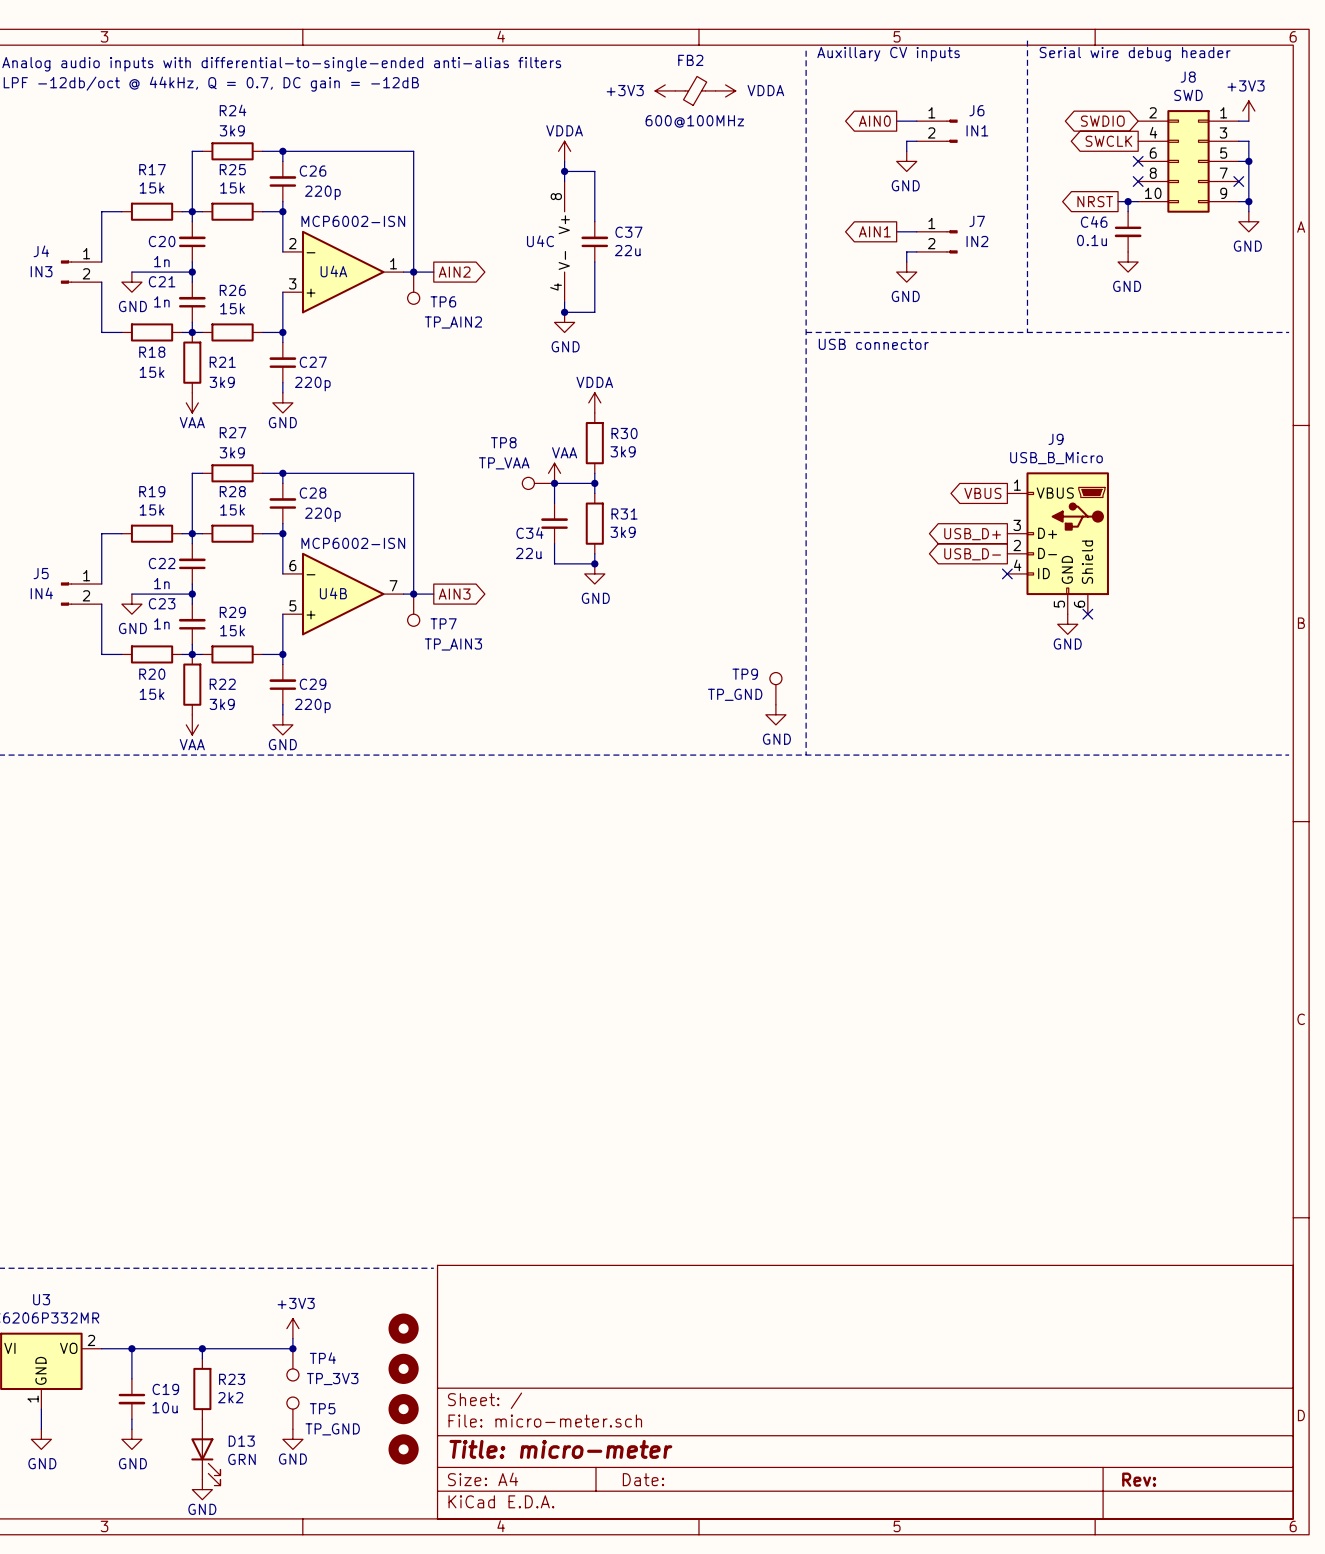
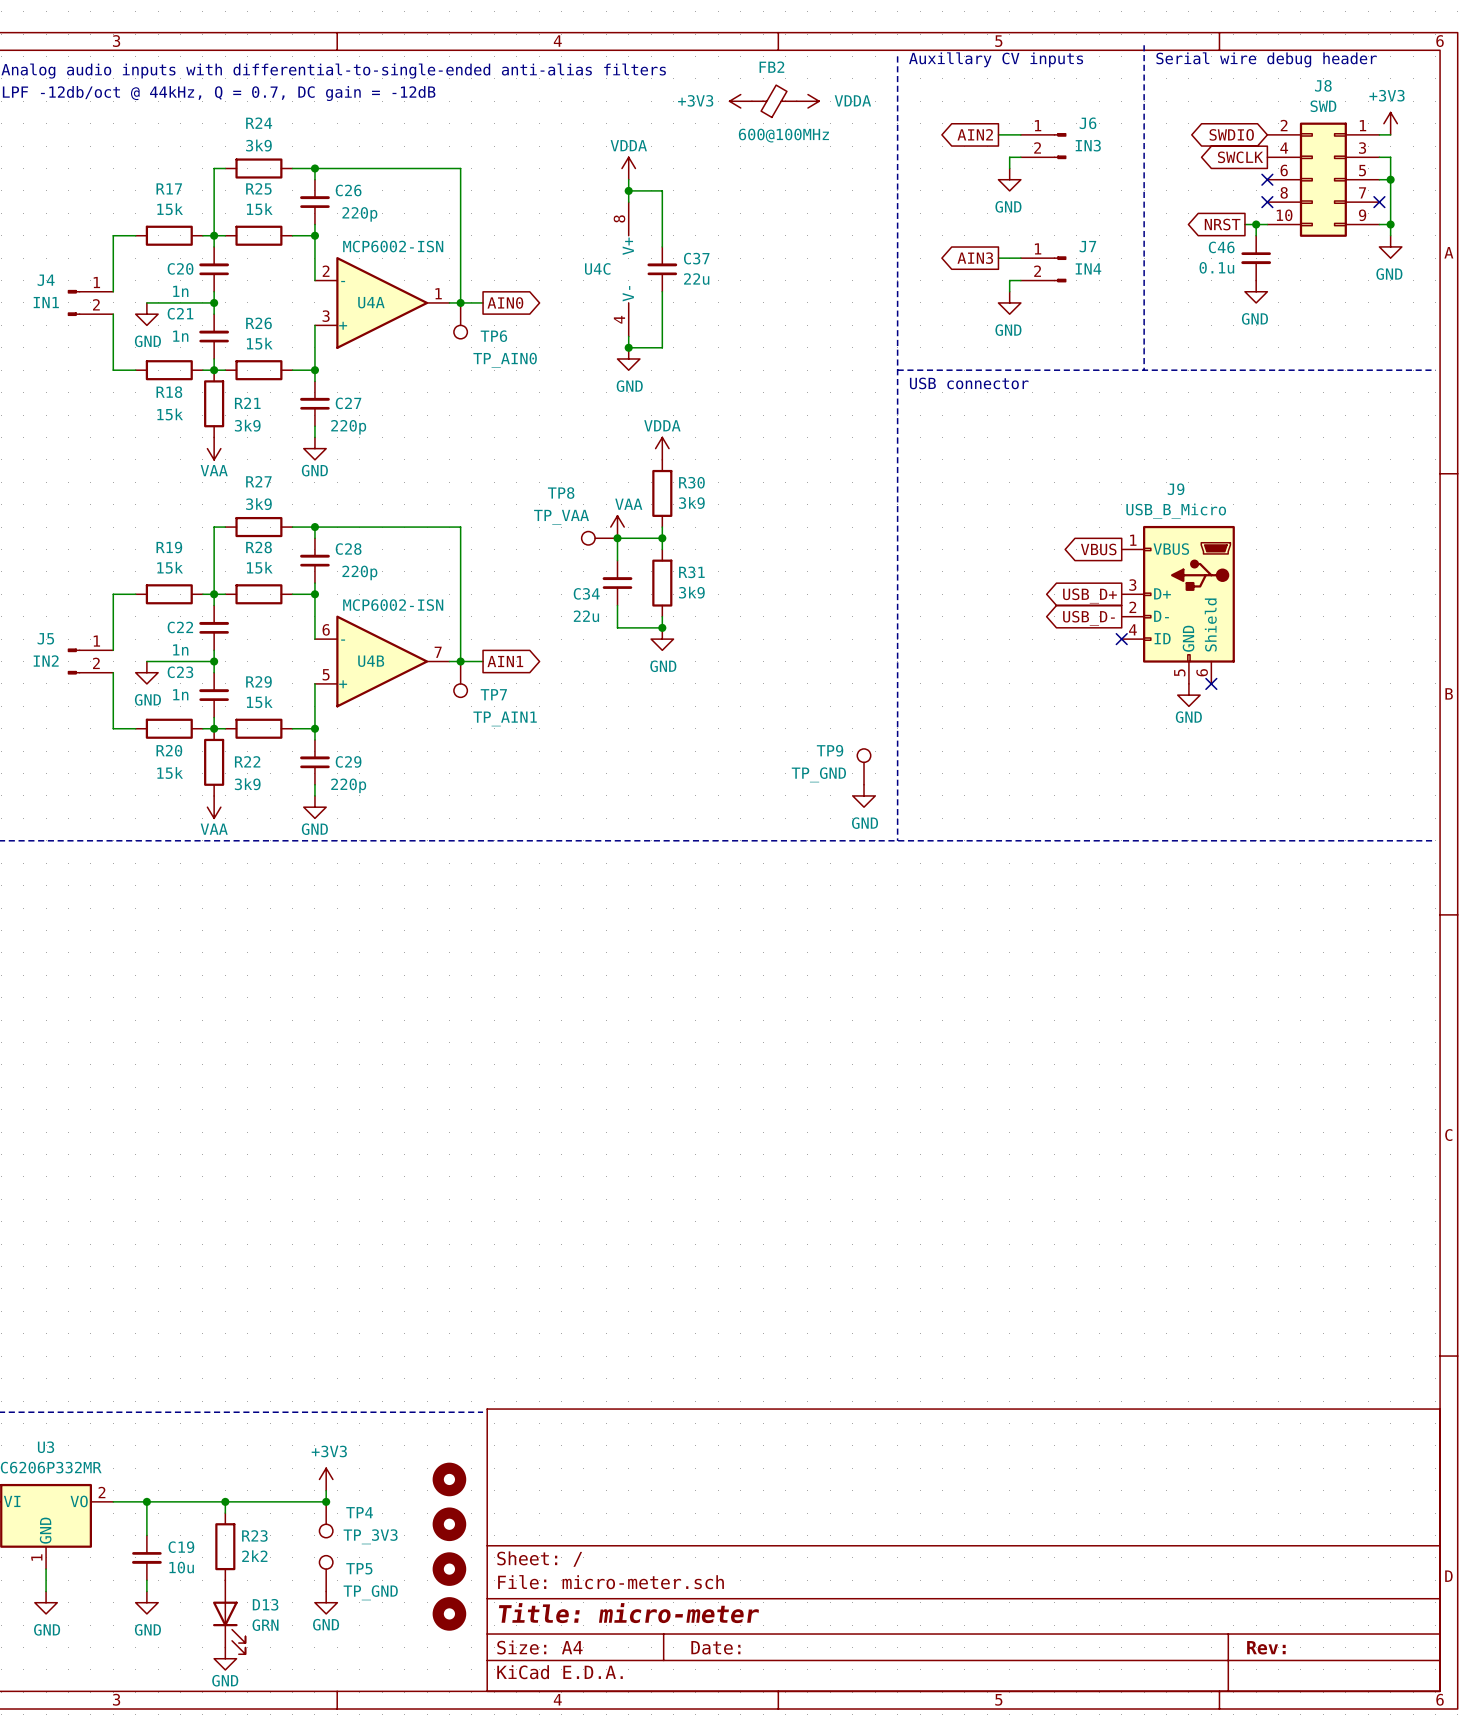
global label: AIN0 (874, 121) -> AIN2 (975, 134)
J6 value: IN1 (977, 130) -> IN3 (1088, 145)
global label: AIN1 (874, 231) -> AIN3 (975, 258)
J7 value: IN2 (977, 241) -> IN4 (1088, 268)
J4 value: IN3 (41, 271) -> IN1 (46, 302)
global label: AIN2 (454, 272) -> AIN0 (505, 302)
TP6 value: TP_AIN2 (453, 322) -> TP_AIN0 (505, 360)
J5 value: IN4 (41, 593) -> IN2 (46, 660)
global label: AIN3 (454, 594) -> AIN1 (505, 661)
TP7 value: TP_AIN3 (453, 644) -> TP_AIN1 (505, 718)

